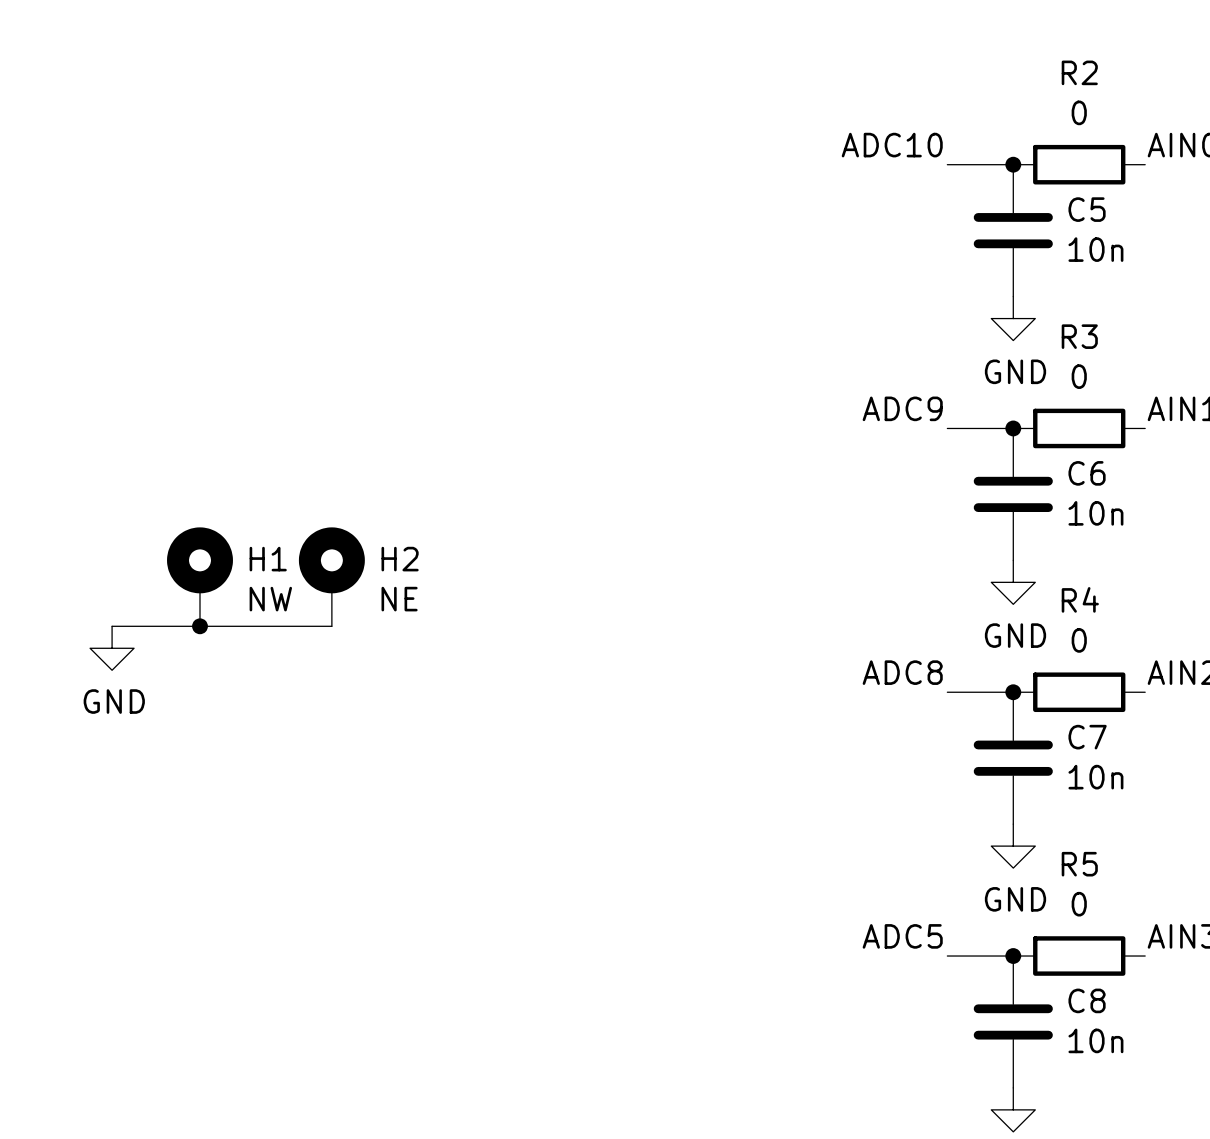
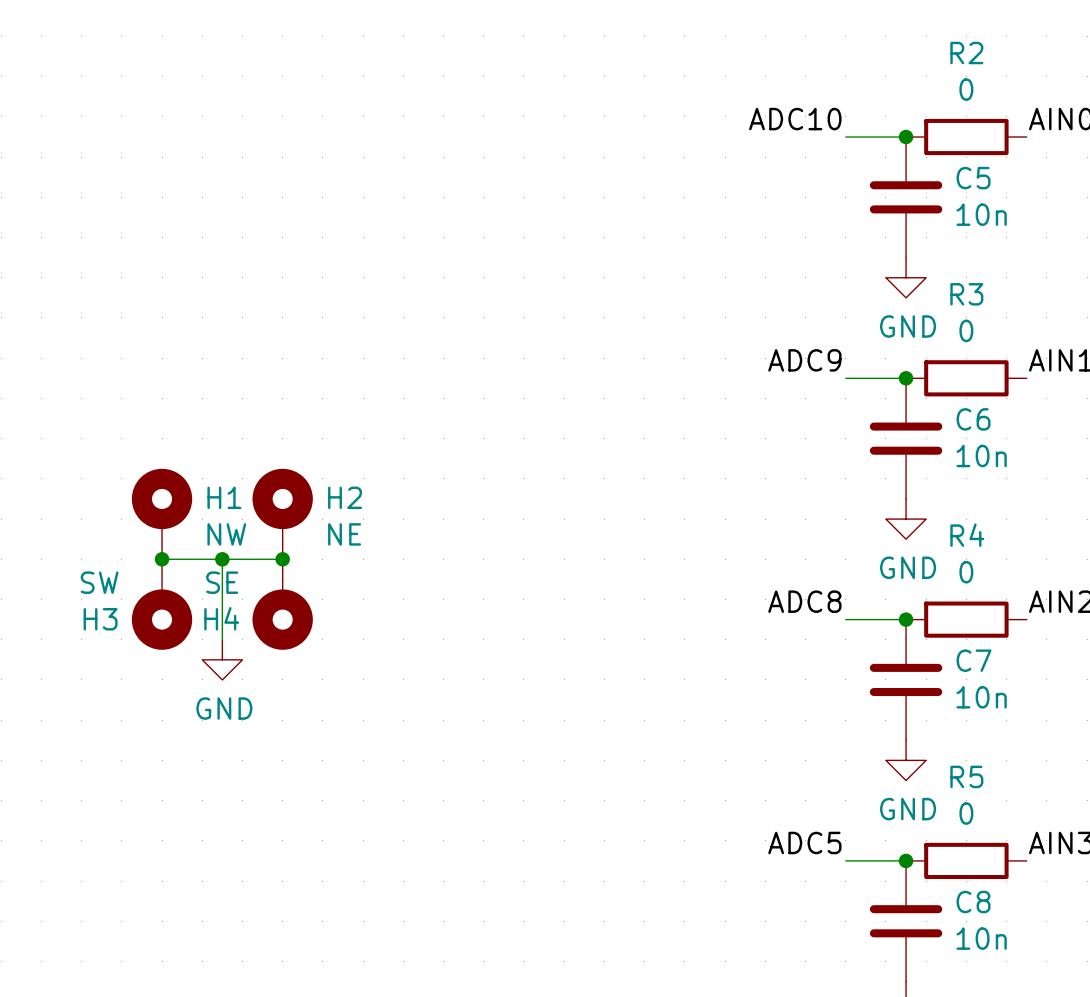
wire: (112, 626) (199, 626) -> none
wire: none -> (222, 559) (222, 639)
junction: none -> (222, 559)
junction: none -> (282, 559)
power symbol position: GND (112, 648) -> GND (222, 659)
H3: none -> SW (162, 604)
H4: none -> SE (282, 604)

